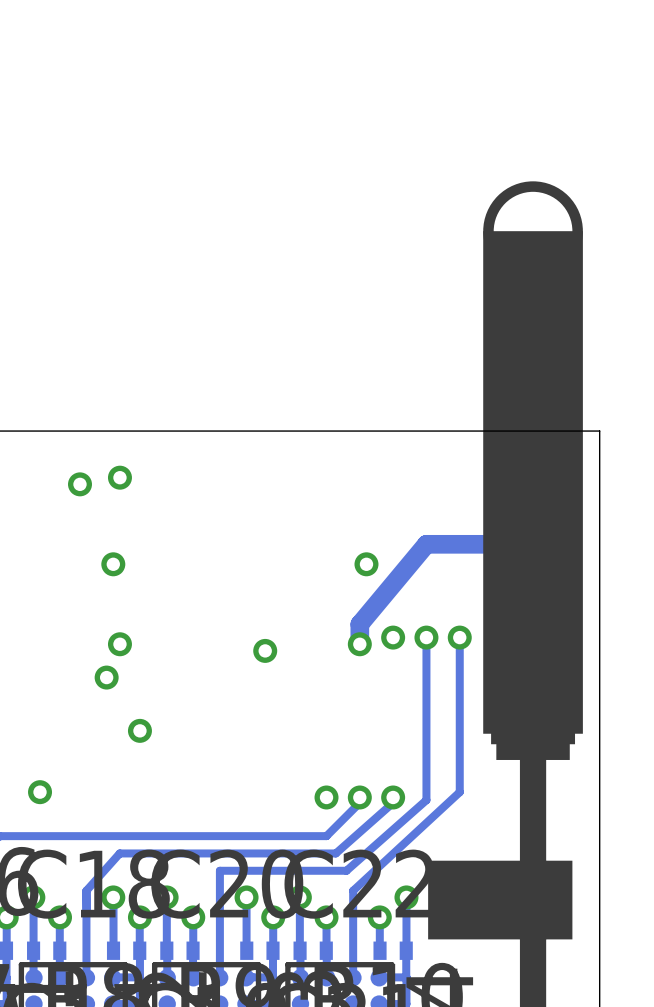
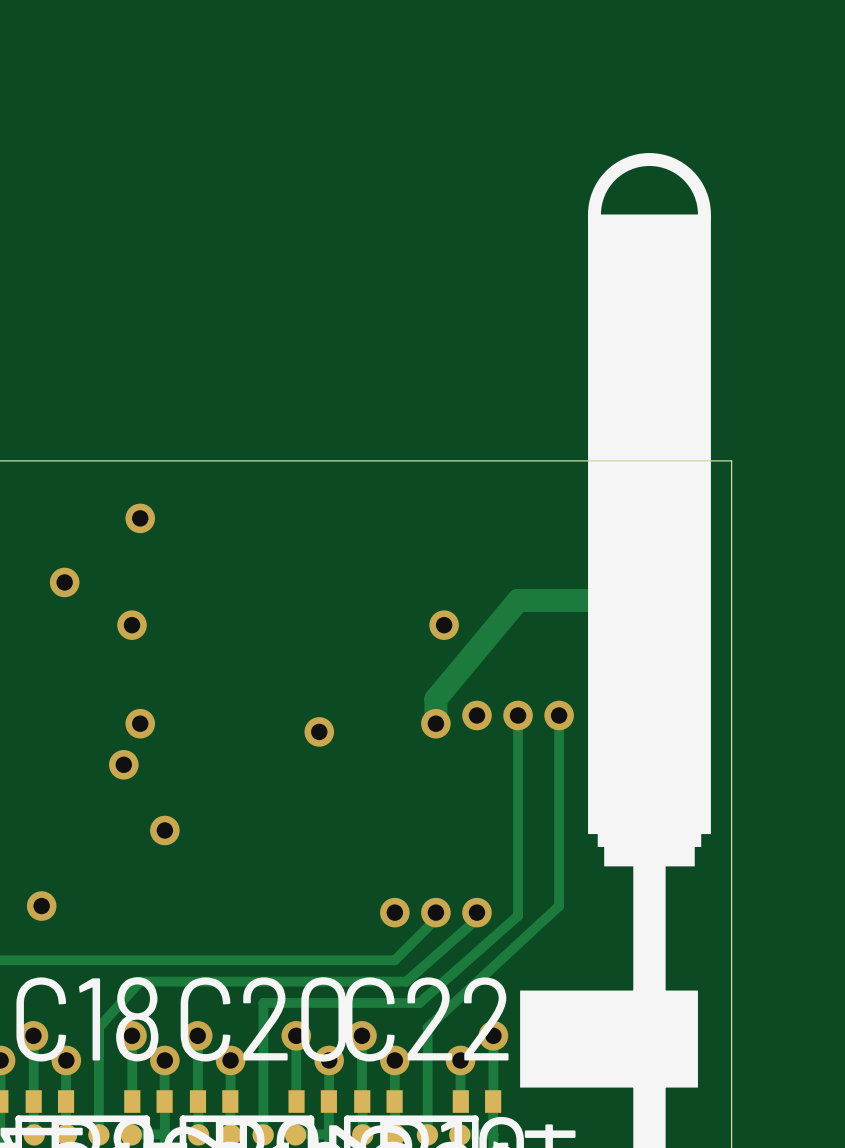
via position: (79, 484) -> (64, 582)

